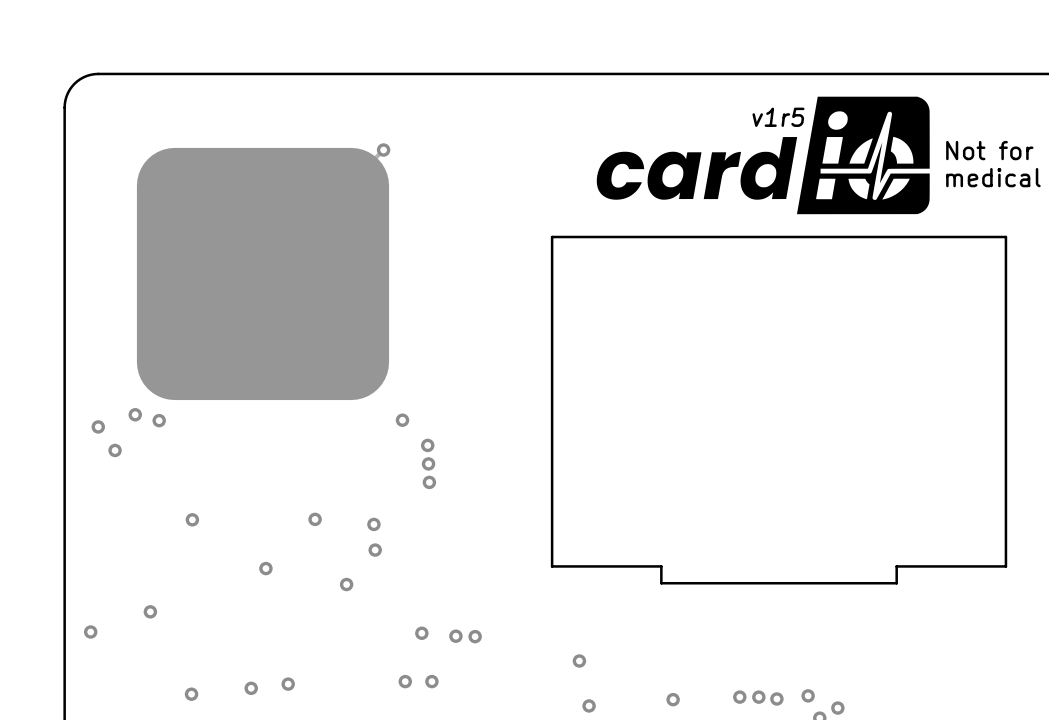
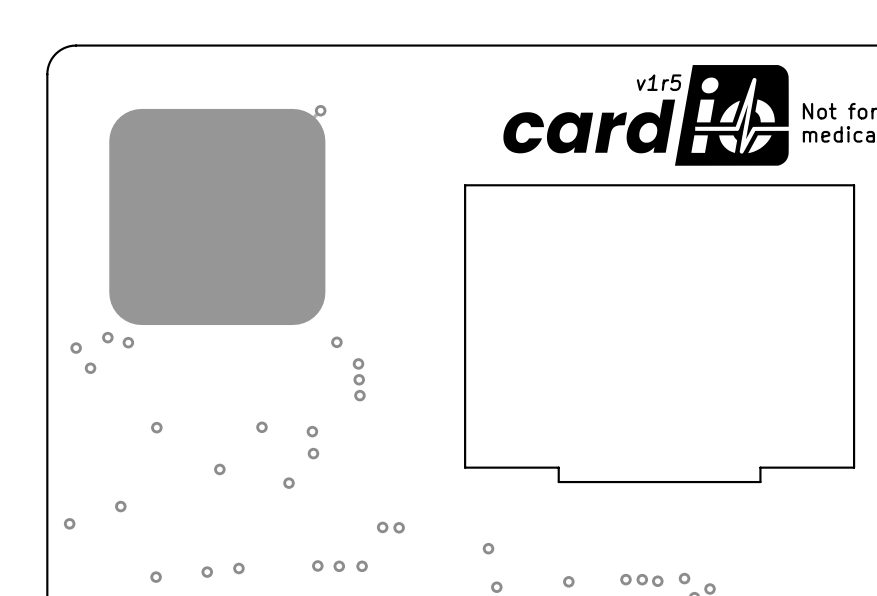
via position: (421, 633) -> (317, 565)

